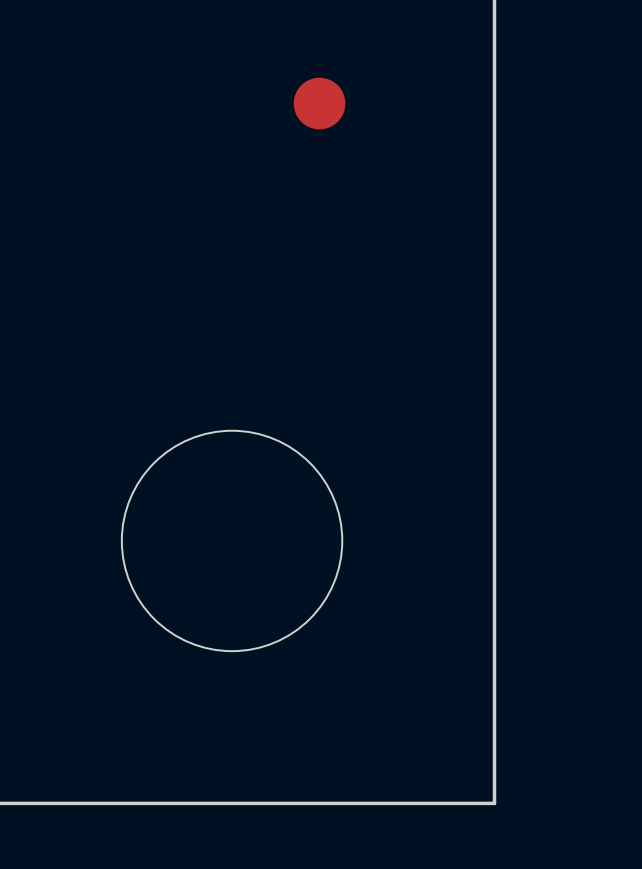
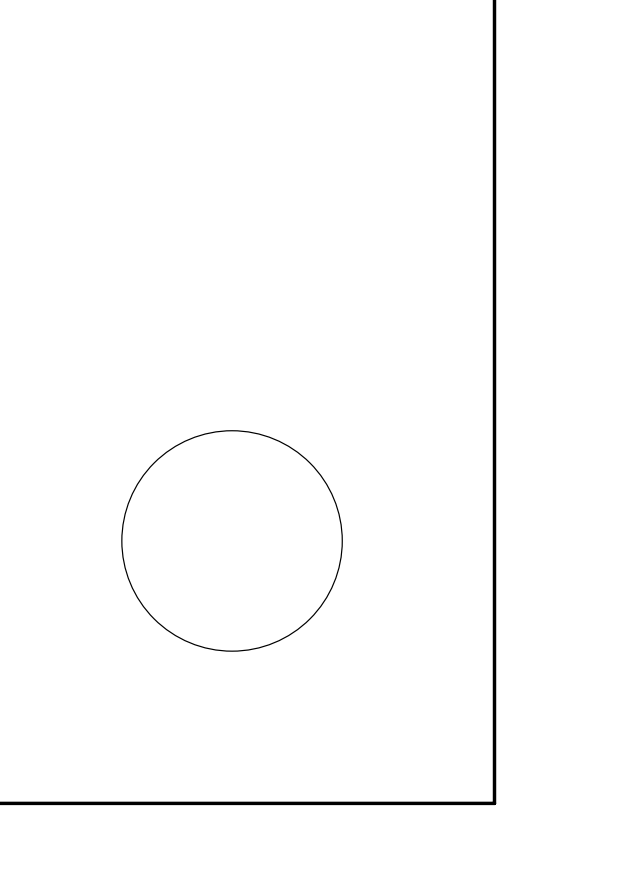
part: (319, 103) -> none

